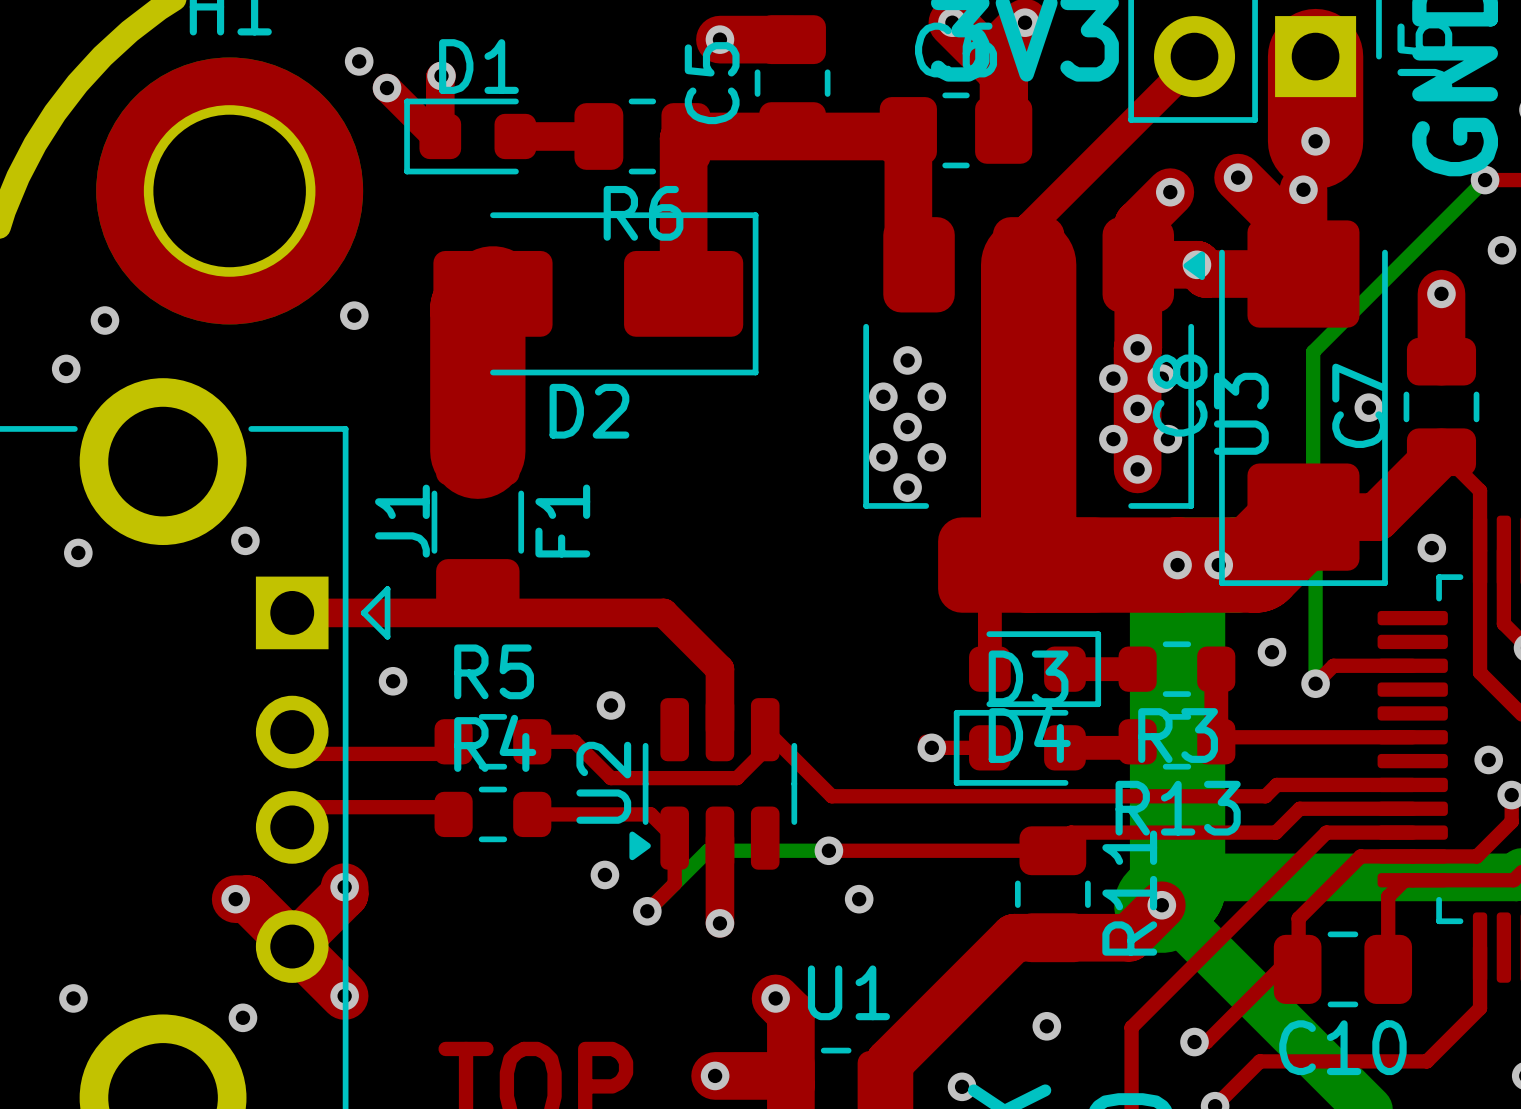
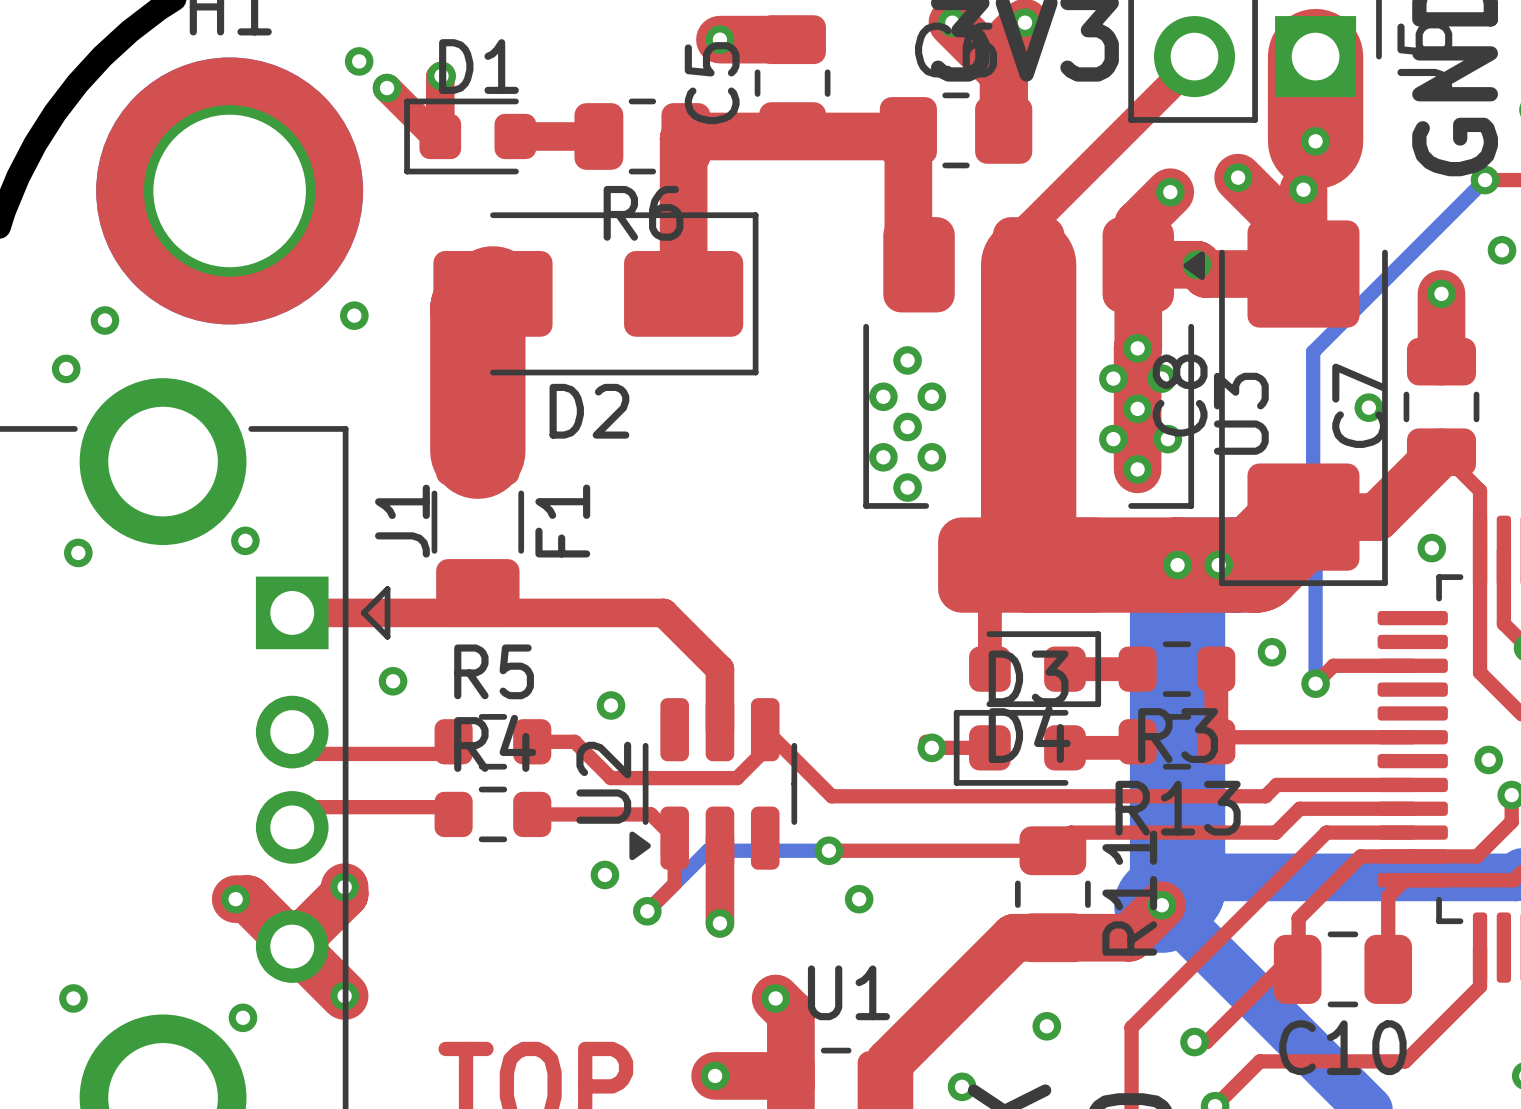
top track: (1480, 986) (1480, 1008) (1426, 1061) (1405, 1061) -> (1480, 986) (1405, 1061)

